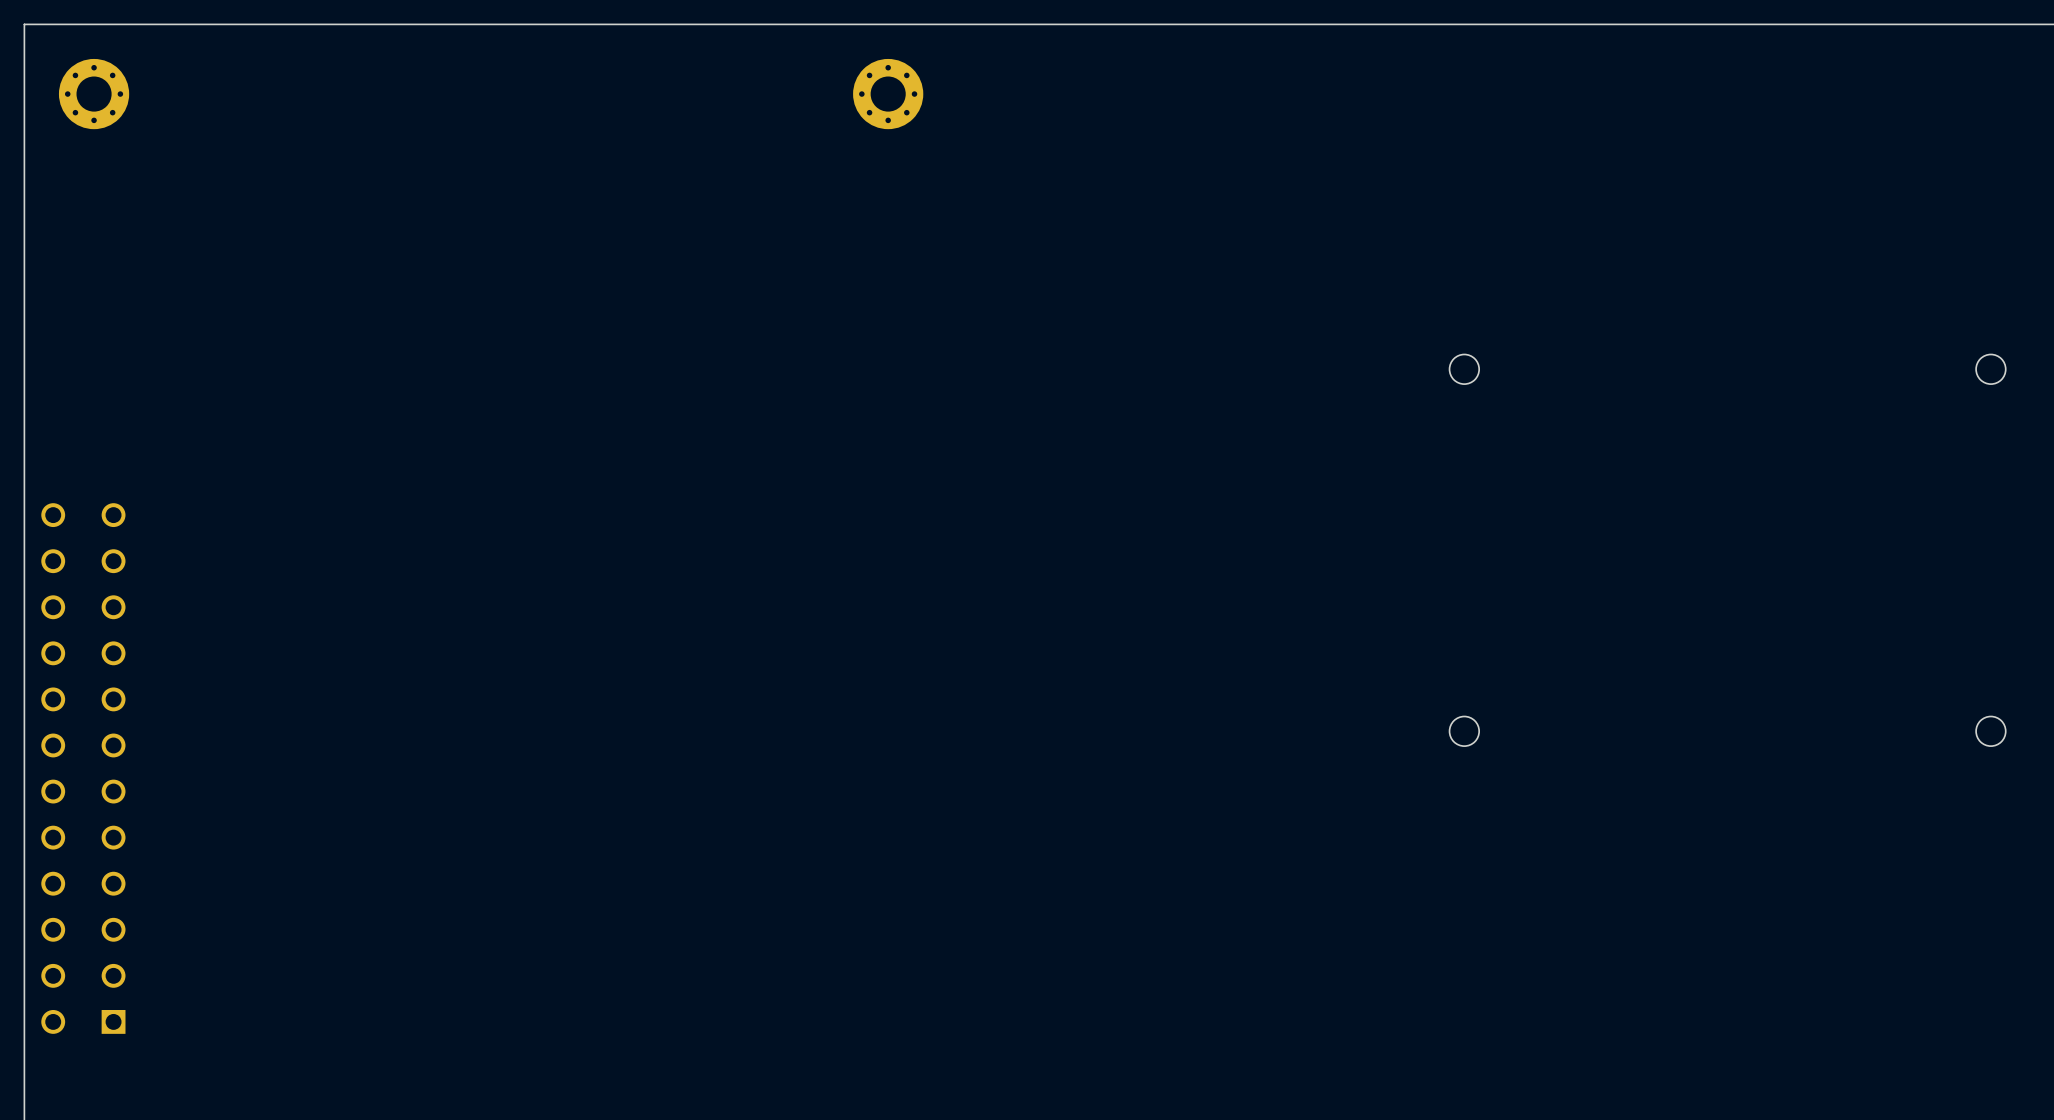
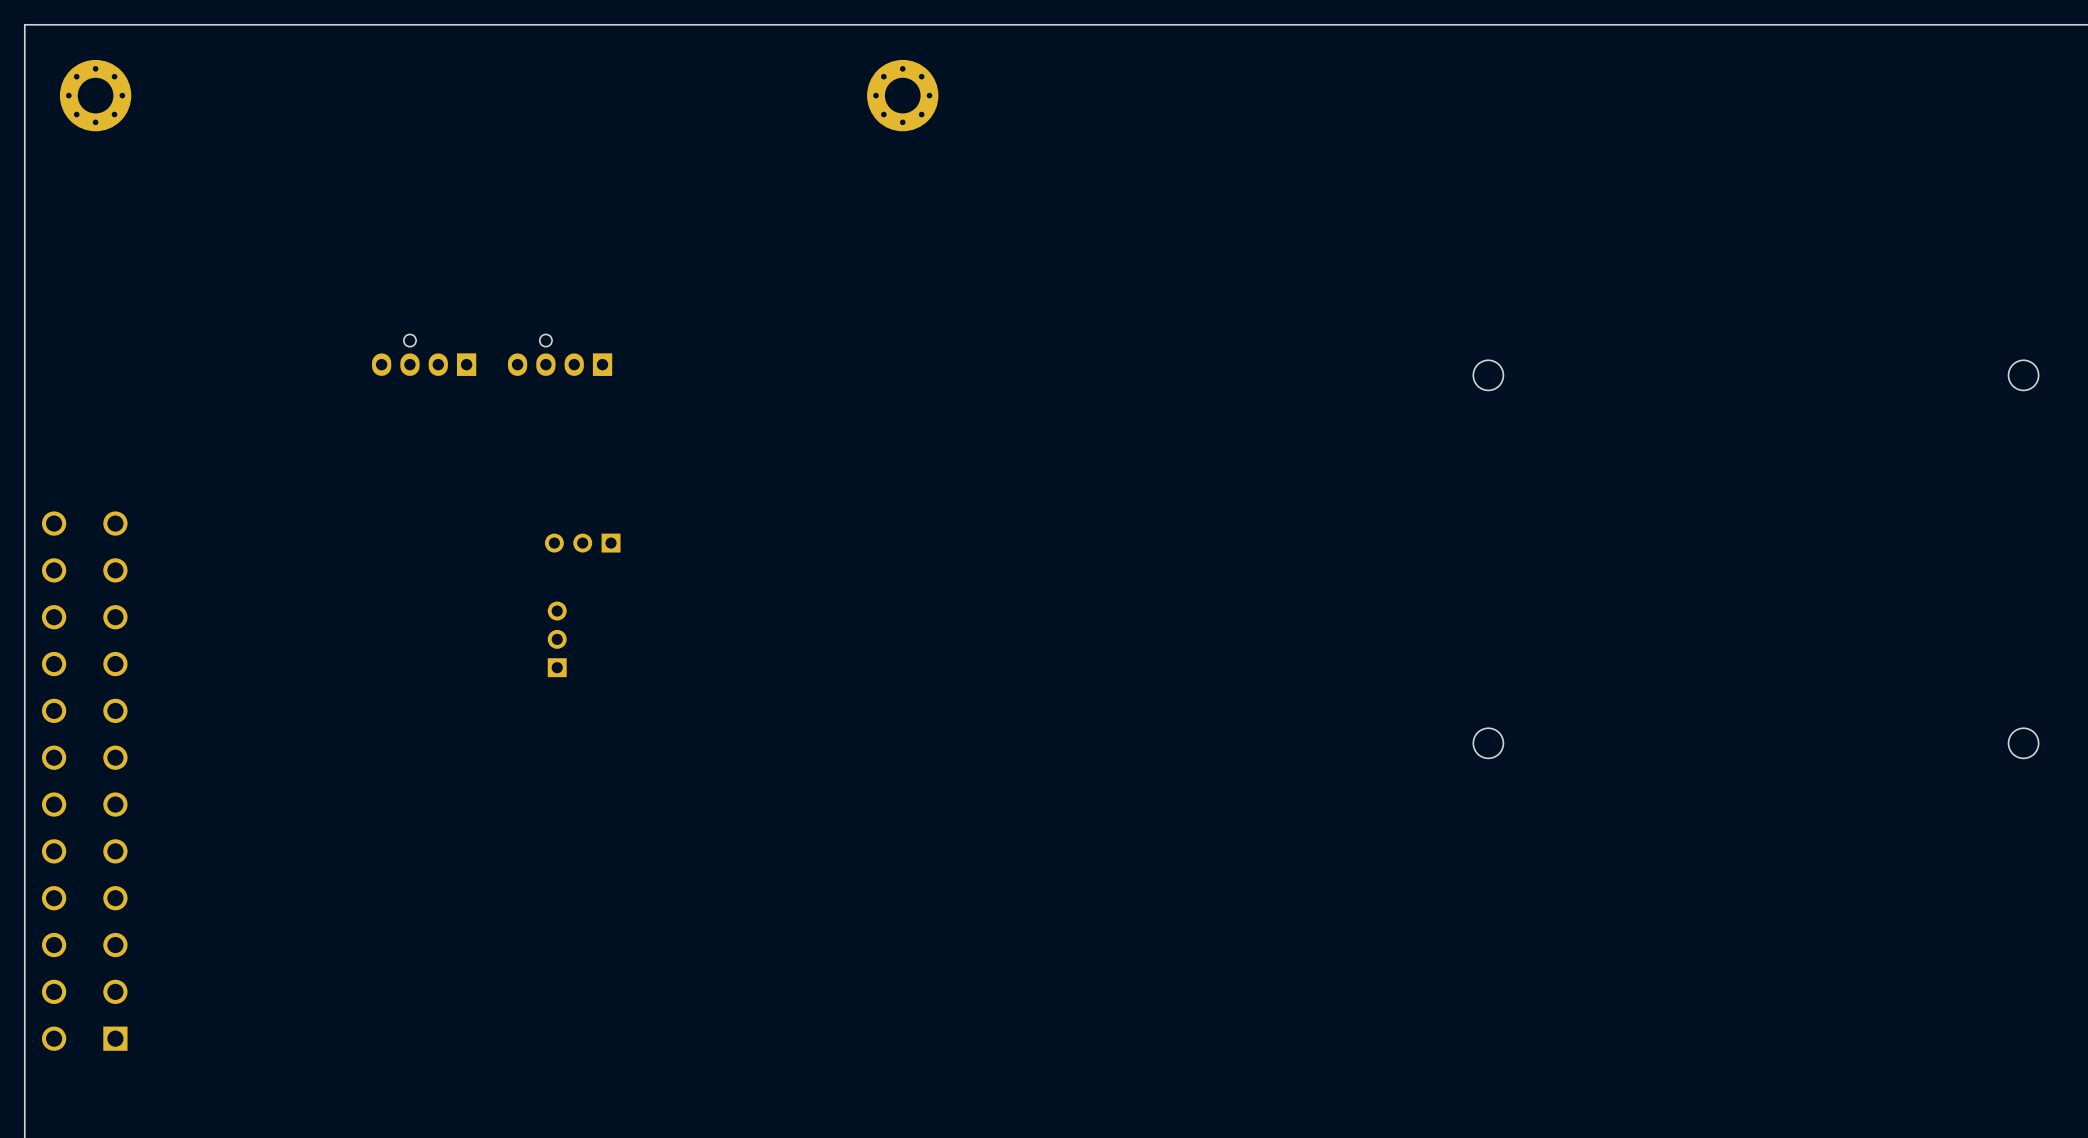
part: none -> (424, 355)
part: none -> (560, 355)
part: none -> (582, 543)
part: none -> (557, 639)

